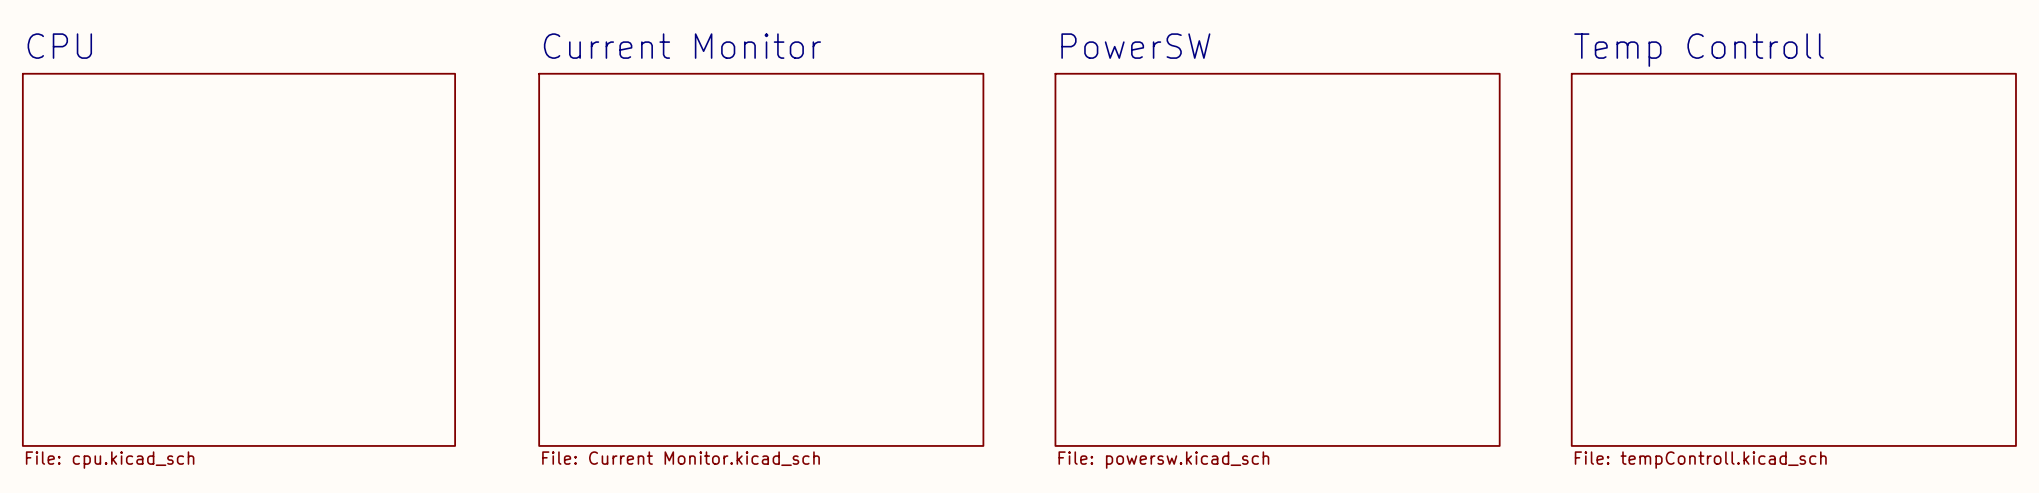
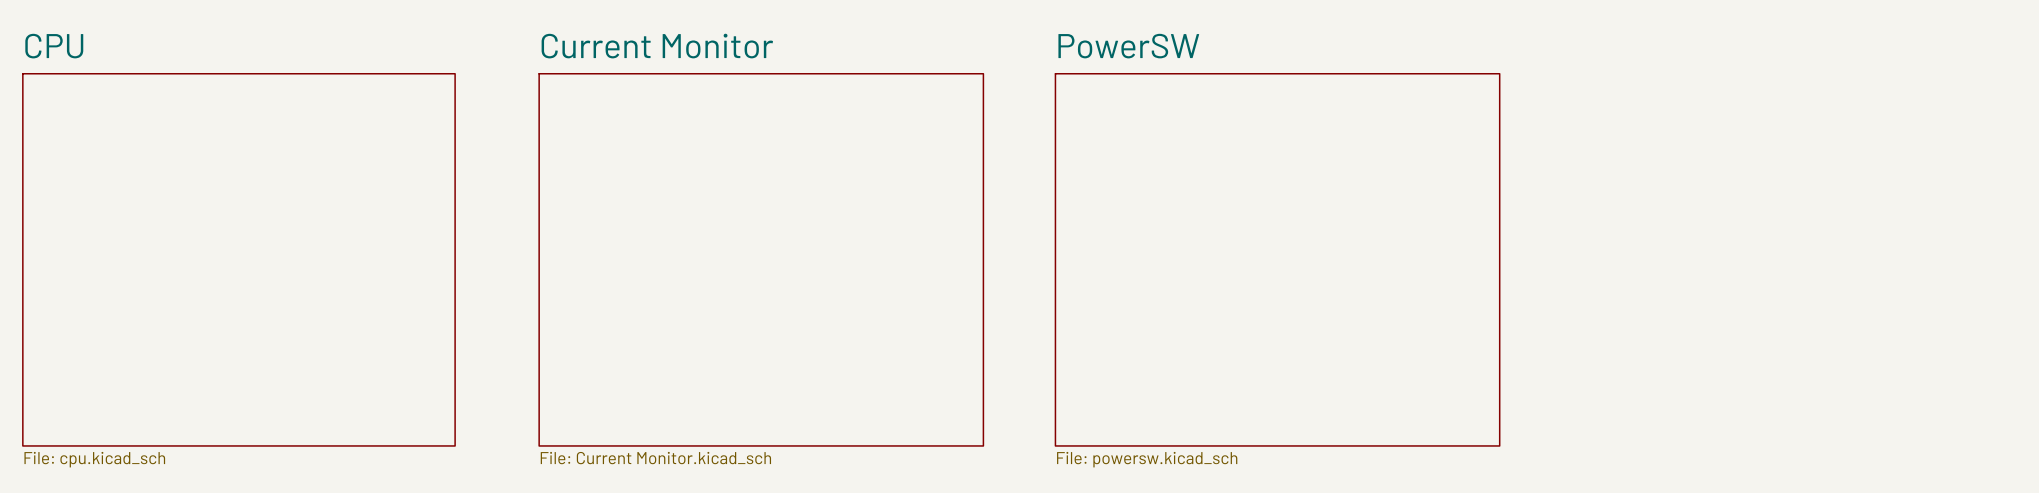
sheet Temp Controll: File: tempControll.kicad_sch (1793, 259) -> none

